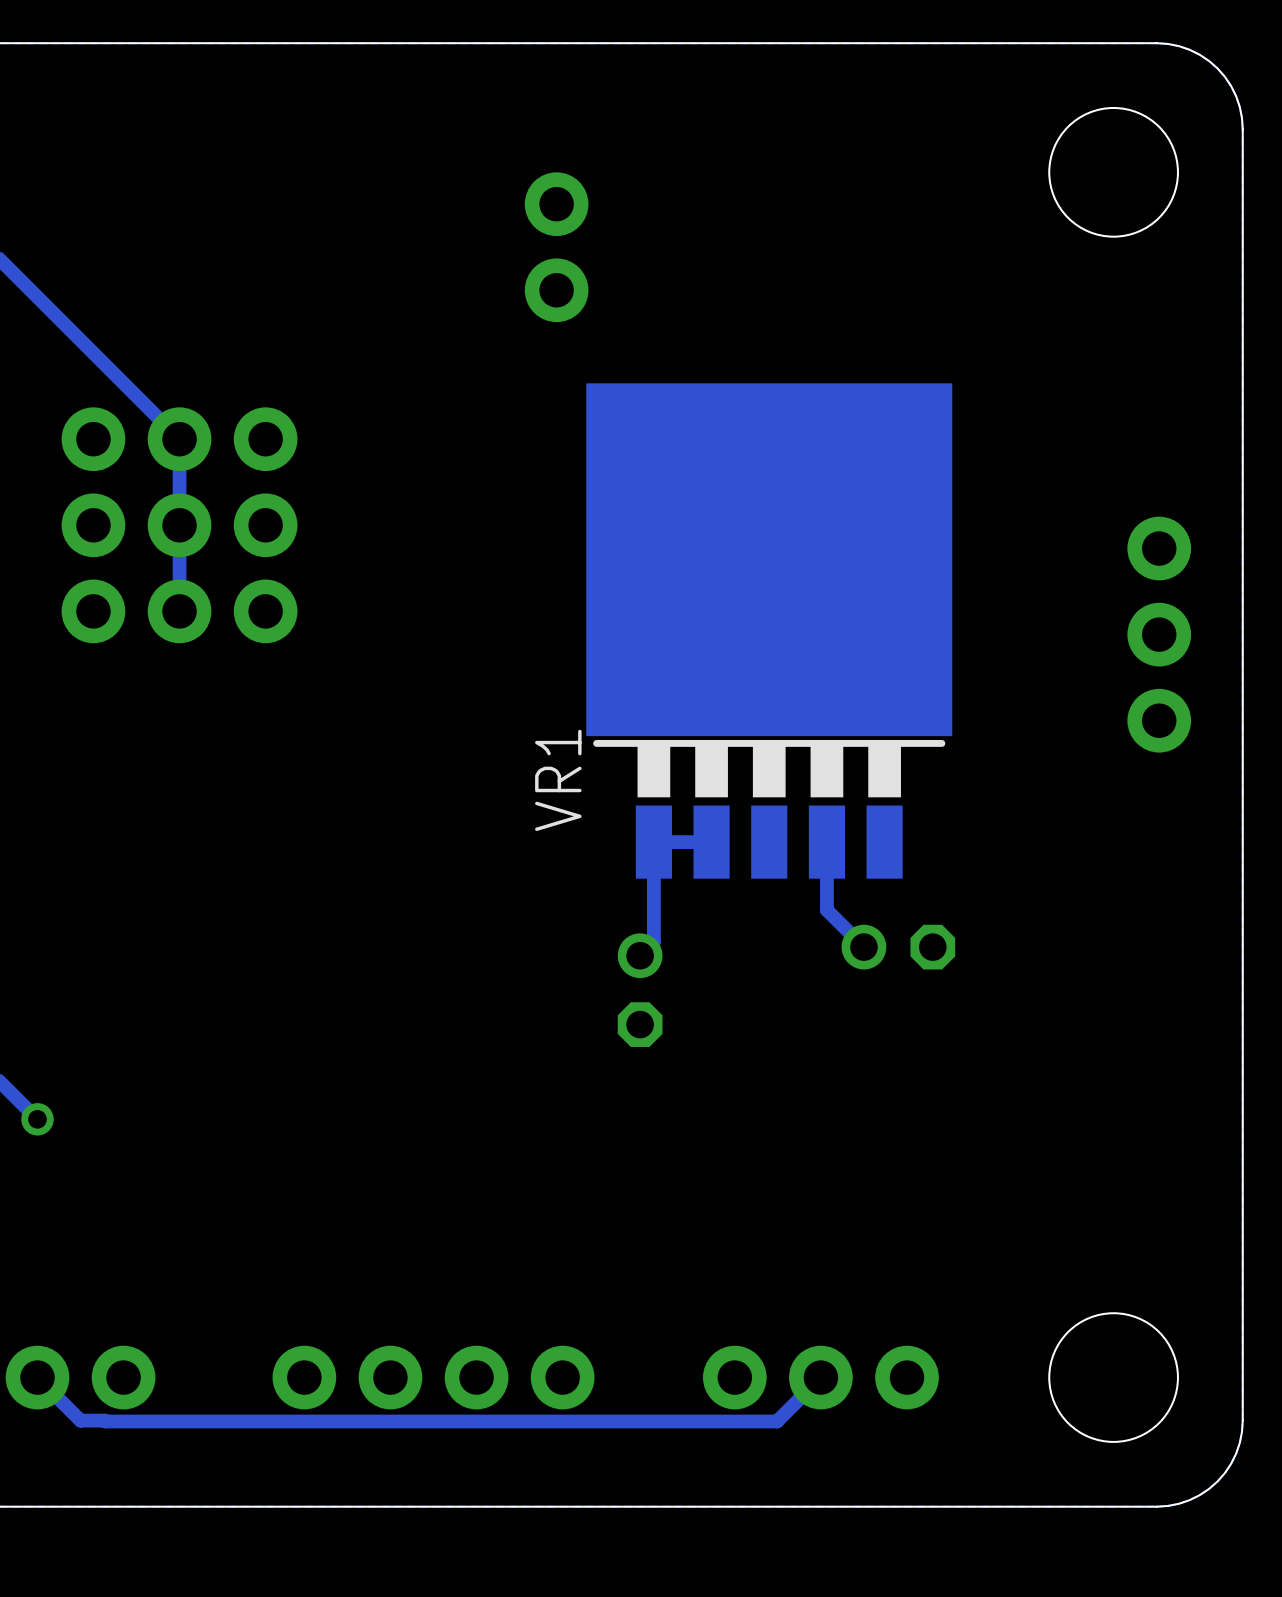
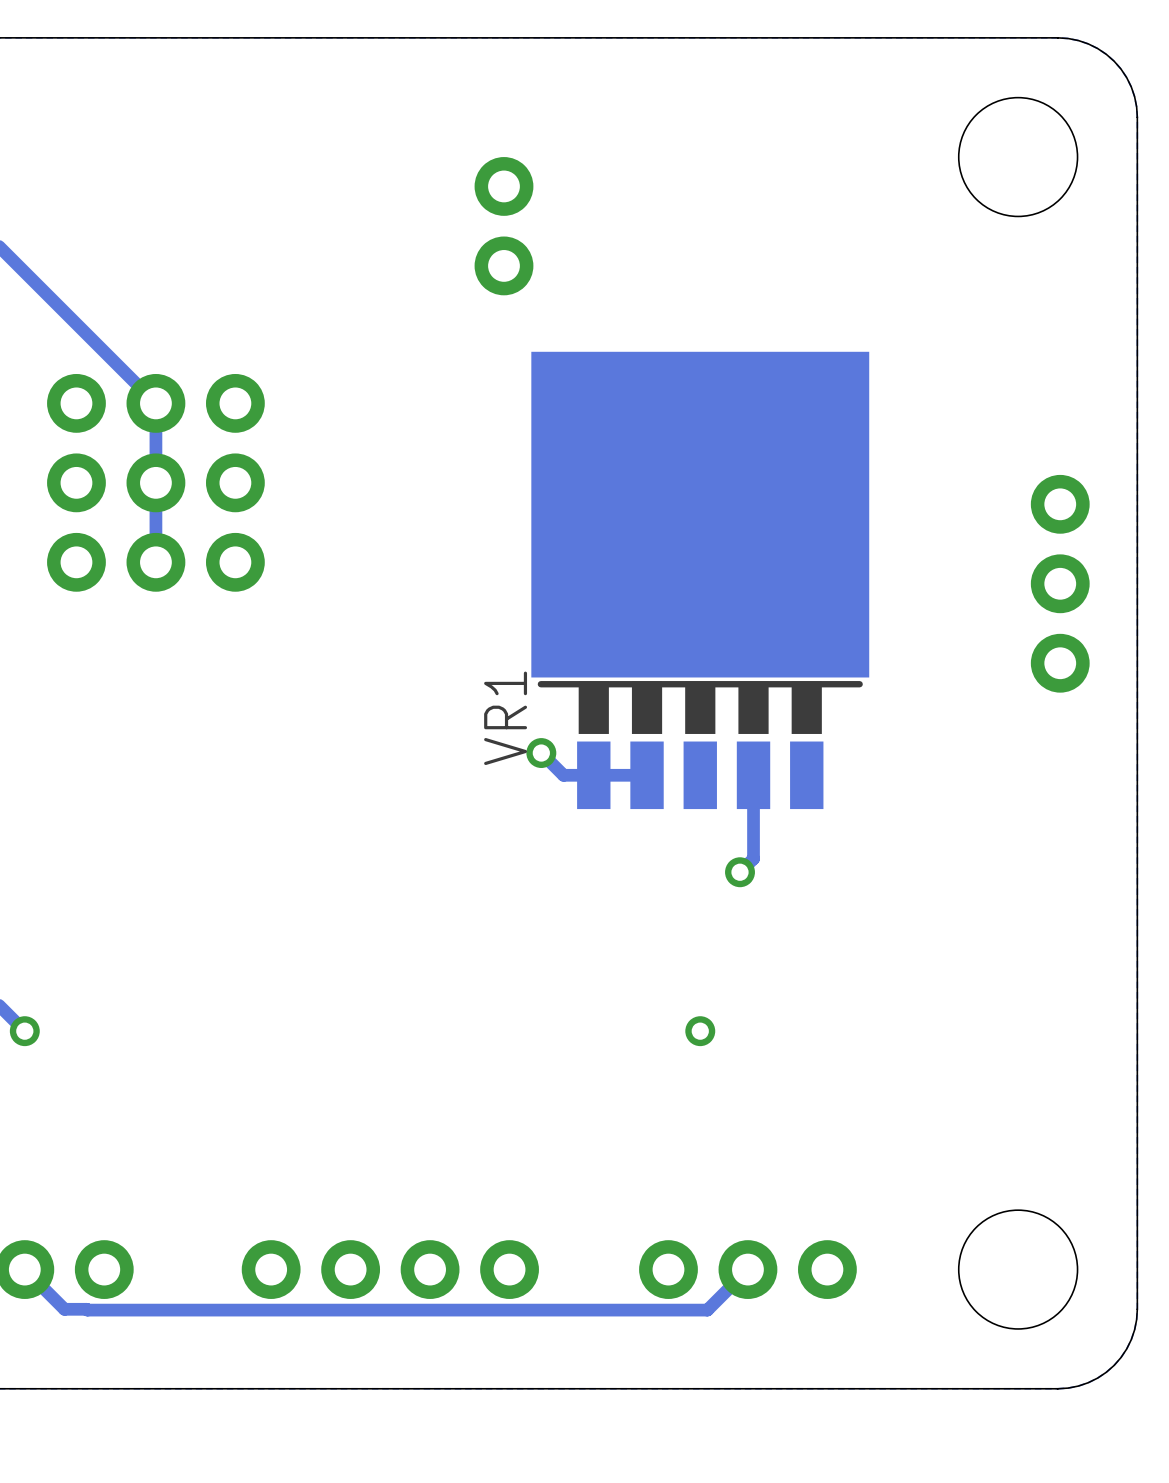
via: none -> (541, 753)
track: (653, 842) (653, 941) (640, 955) -> (593, 775) (563, 775) (541, 753)
track: (826, 910) (863, 947) -> (753, 838) (753, 858) (740, 872)
via: none -> (740, 872)
part: (898, 947) -> none
part: (640, 990) -> none
via: none -> (700, 1031)

